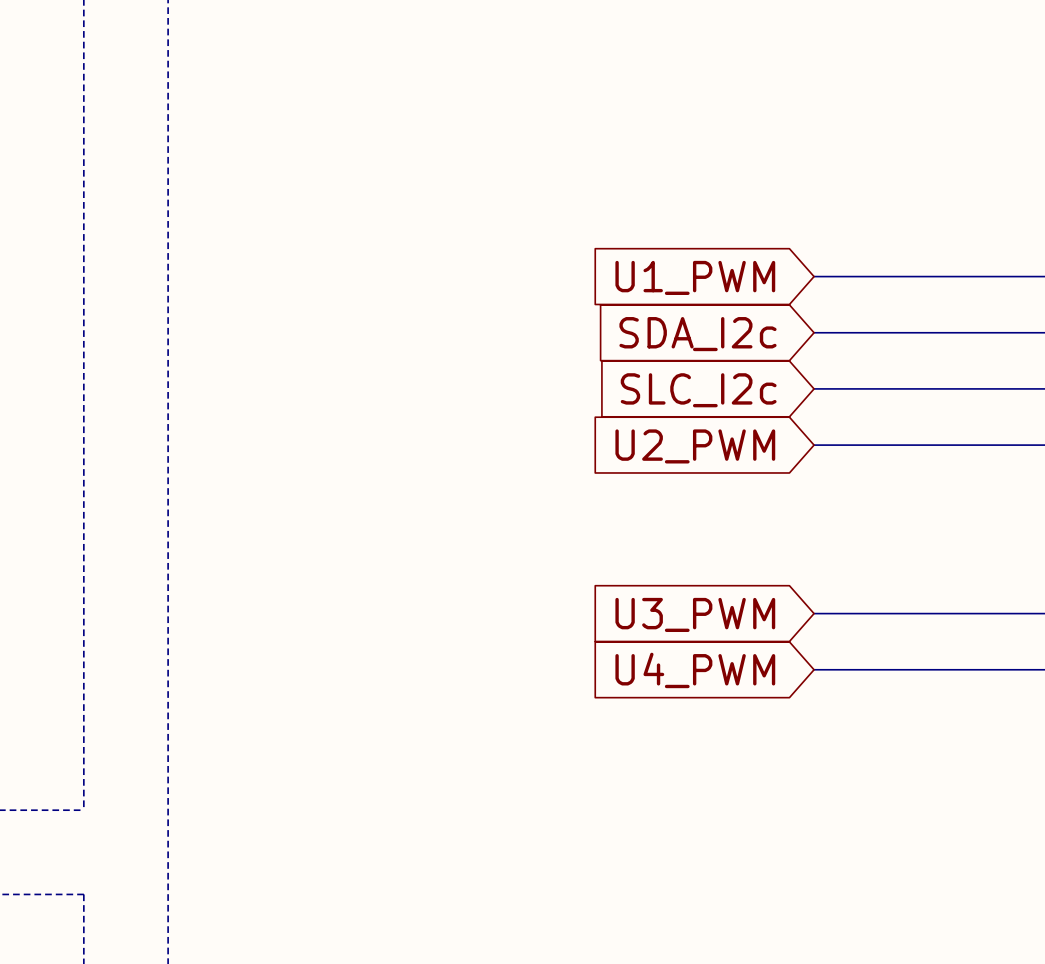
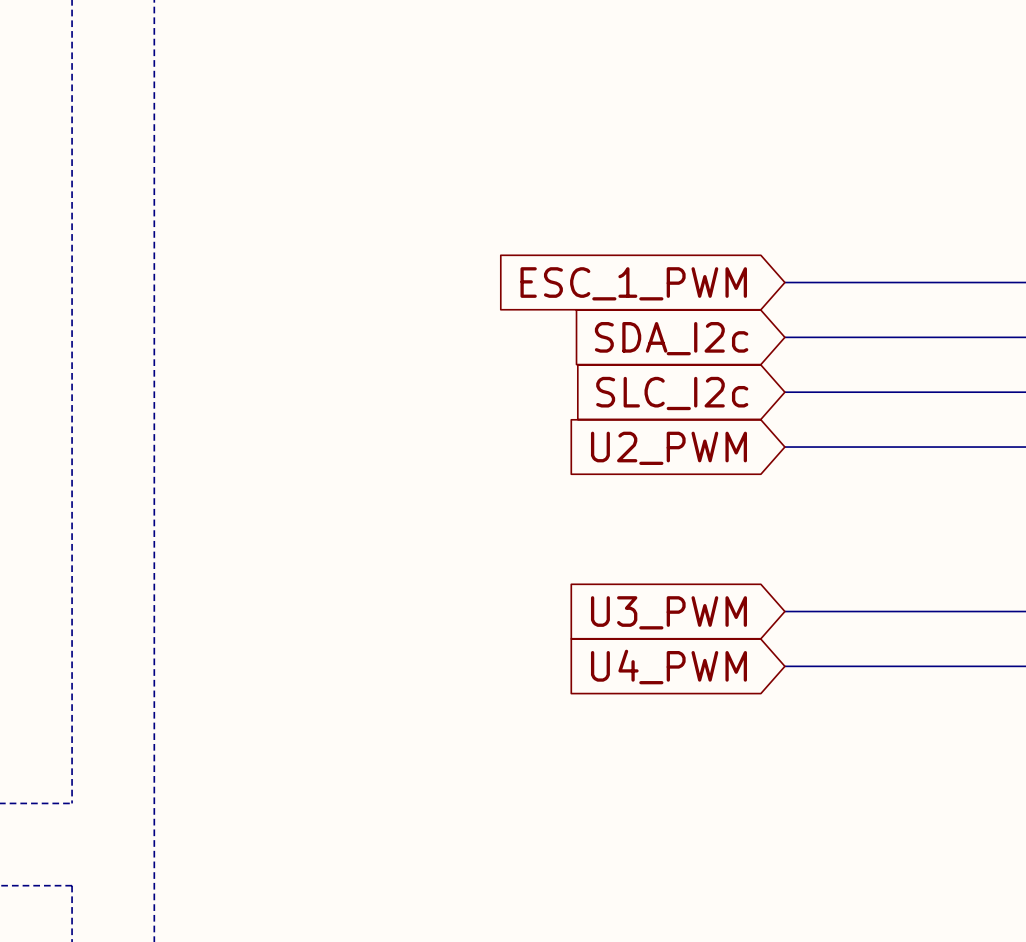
global label: U1_PWM (695, 277) -> ESC_1_PWM (633, 283)

